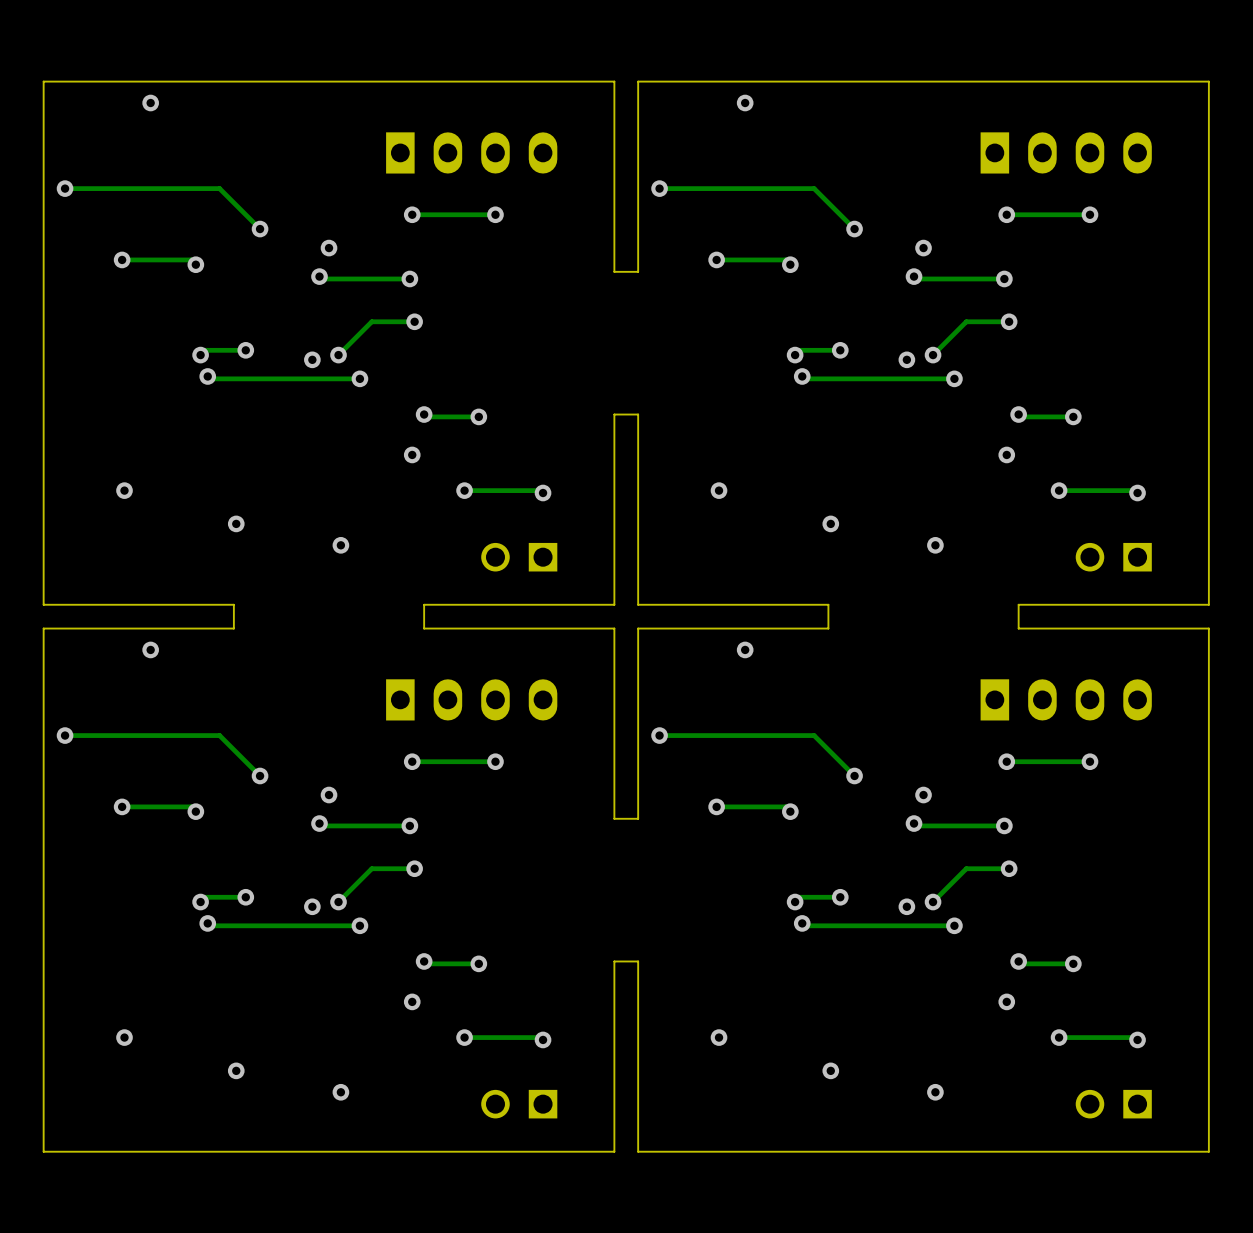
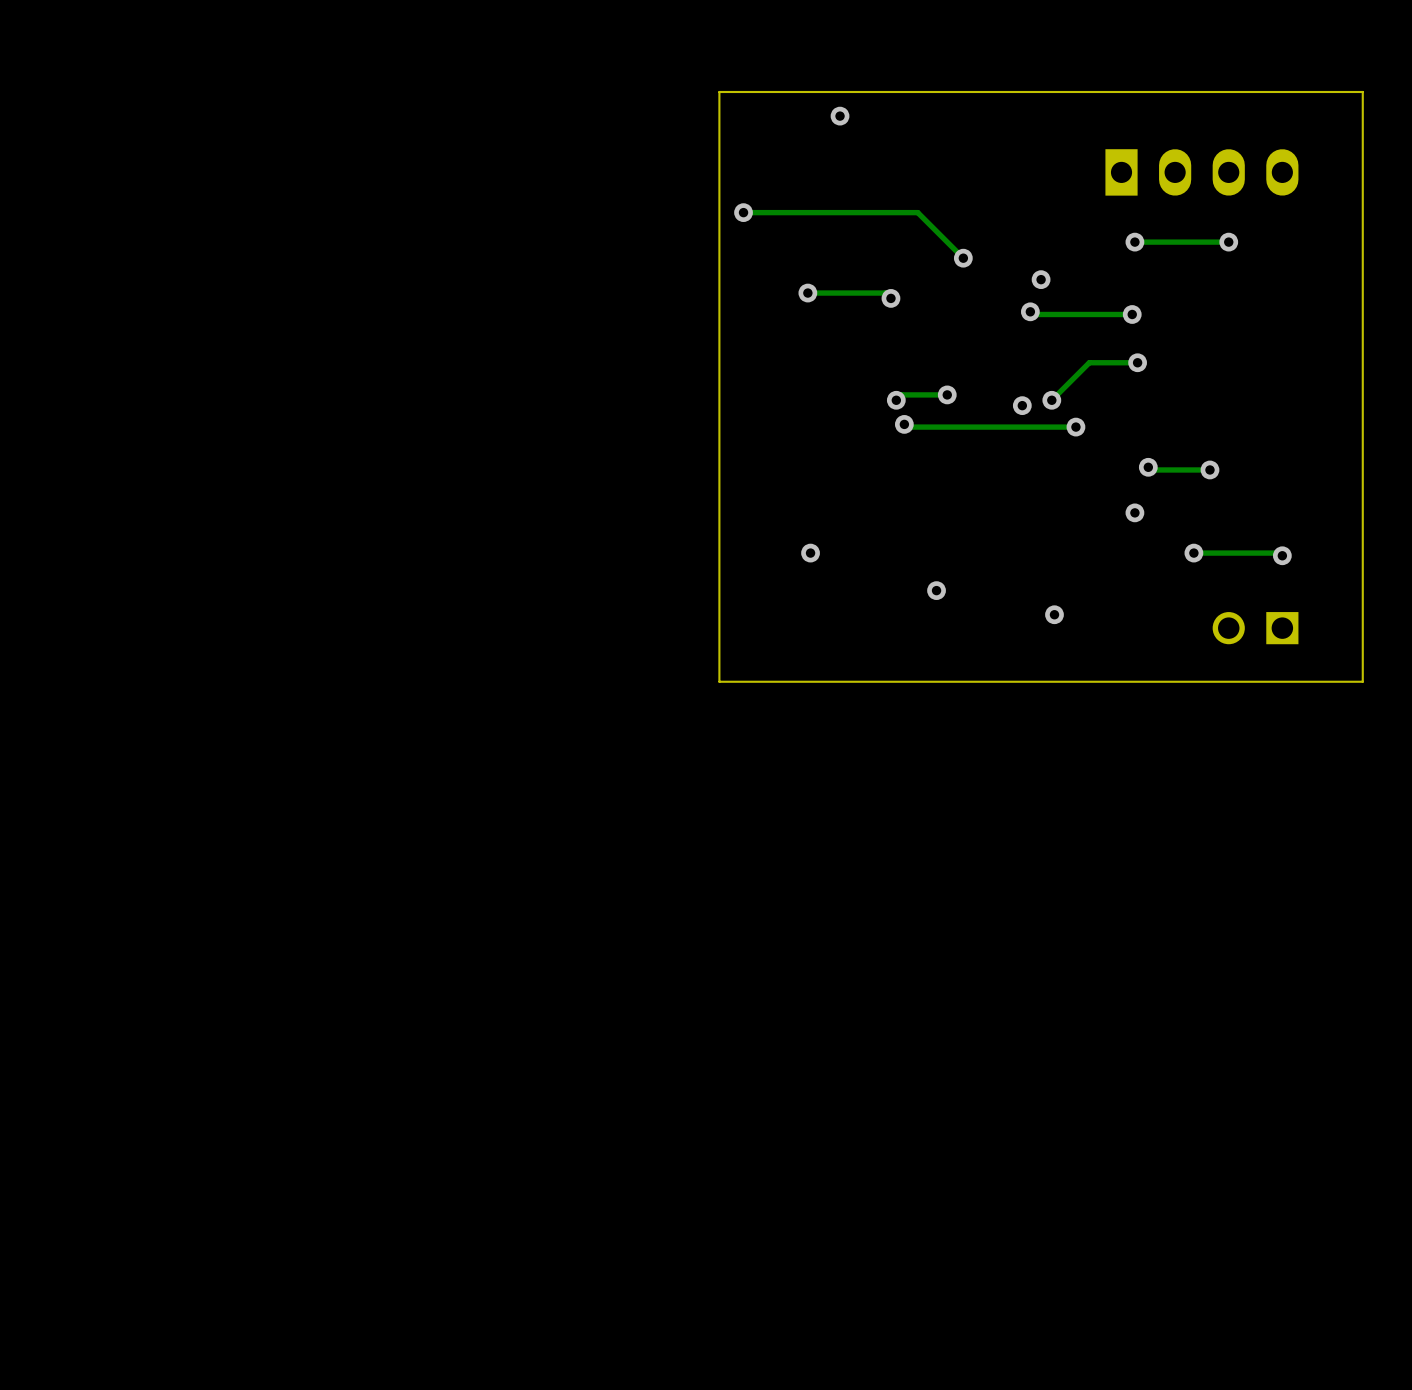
via: (150, 103) -> none
part: (471, 152) -> none
track: (65, 188) (219, 188) (260, 229) -> none
via: (65, 188) -> none
via: (412, 214) -> none
track: (495, 214) (412, 214) -> none
via: (495, 214) -> none
via: (260, 229) -> none
via: (329, 248) -> none
track: (122, 259) (191, 259) (195, 264) -> none
via: (122, 259) -> none
via: (195, 264) -> none
board edge: (638, 271) (614, 271) (614, 81) (43, 81) (43, 604) (233, 604) (233, 628) (43, 628) (43, 1151) (614, 1151) (614, 961) (638, 961) (638, 1151) (1208, 1151) (1208, 628) (1018, 628) (1018, 604) -> (933, 681) (1148, 681)
track: (319, 276) (321, 278) (409, 278) -> none
via: (319, 276) -> none
via: (409, 278) -> none
track: (414, 321) (371, 321) (338, 355) -> none
via: (414, 321) -> none
track: (245, 350) (205, 350) (200, 355) -> none
via: (245, 350) -> none
via: (200, 355) -> none
via: (338, 355) -> none
via: (312, 359) -> none
track: (207, 376) (210, 378) (359, 378) -> none
via: (207, 376) -> none
via: (359, 378) -> none
track: (424, 414) (426, 416) (478, 416) -> none
via: (424, 414) -> none
board edge: (638, 414) (614, 414) (614, 604) (424, 604) (424, 628) (614, 628) (614, 818) (638, 818) (638, 628) (828, 628) (828, 604) -> (719, 467) (719, 306)
via: (478, 416) -> none
via: (412, 454) -> none
via: (124, 490) -> none
track: (464, 490) (540, 490) (543, 493) -> none
via: (464, 490) -> none
via: (543, 493) -> none
via: (236, 523) -> none
via: (340, 545) -> none
part: (519, 557) -> none
via: (150, 649) -> none
via: (745, 649) -> none
part: (471, 699) -> none
part: (1066, 699) -> none
track: (65, 735) (219, 735) (260, 775) -> none
via: (65, 735) -> none
track: (659, 735) (814, 735) (854, 775) -> none
via: (659, 735) -> none
via: (412, 761) -> none
track: (495, 761) (412, 761) -> none
via: (495, 761) -> none
via: (1006, 761) -> none
track: (1089, 761) (1006, 761) -> none
via: (1089, 761) -> none
via: (260, 775) -> none
via: (854, 775) -> none
via: (329, 795) -> none
via: (923, 795) -> none
track: (122, 806) (191, 806) (195, 811) -> none
via: (122, 806) -> none
track: (716, 806) (785, 806) (790, 811) -> none
via: (716, 806) -> none
via: (195, 811) -> none
via: (790, 811) -> none
track: (319, 823) (321, 825) (409, 825) -> none
via: (319, 823) -> none
track: (914, 823) (916, 825) (1004, 825) -> none
via: (914, 823) -> none
via: (409, 825) -> none
via: (1004, 825) -> none
track: (414, 868) (371, 868) (338, 902) -> none
via: (414, 868) -> none
track: (1009, 868) (966, 868) (933, 902) -> none
via: (1009, 868) -> none
track: (245, 897) (205, 897) (200, 902) -> none
via: (245, 897) -> none
track: (840, 897) (799, 897) (795, 902) -> none
via: (840, 897) -> none
via: (200, 902) -> none
via: (338, 902) -> none
via: (795, 902) -> none
via: (933, 902) -> none
via: (312, 906) -> none
via: (906, 906) -> none
track: (207, 923) (210, 925) (359, 925) -> none
via: (207, 923) -> none
track: (802, 923) (804, 925) (954, 925) -> none
via: (802, 923) -> none
via: (359, 925) -> none
via: (954, 925) -> none
track: (424, 961) (426, 963) (478, 963) -> none
via: (424, 961) -> none
track: (1018, 961) (1021, 963) (1073, 963) -> none
via: (1018, 961) -> none
via: (478, 963) -> none
via: (1073, 963) -> none
via: (412, 1001) -> none
via: (1006, 1001) -> none
via: (124, 1037) -> none
track: (464, 1037) (540, 1037) (543, 1039) -> none
via: (464, 1037) -> none
via: (719, 1037) -> none
track: (1059, 1037) (1135, 1037) (1137, 1039) -> none
via: (1059, 1037) -> none
via: (543, 1039) -> none
via: (1137, 1039) -> none
via: (236, 1070) -> none
via: (830, 1070) -> none
via: (340, 1092) -> none
via: (935, 1092) -> none
part: (519, 1104) -> none
part: (1113, 1104) -> none

